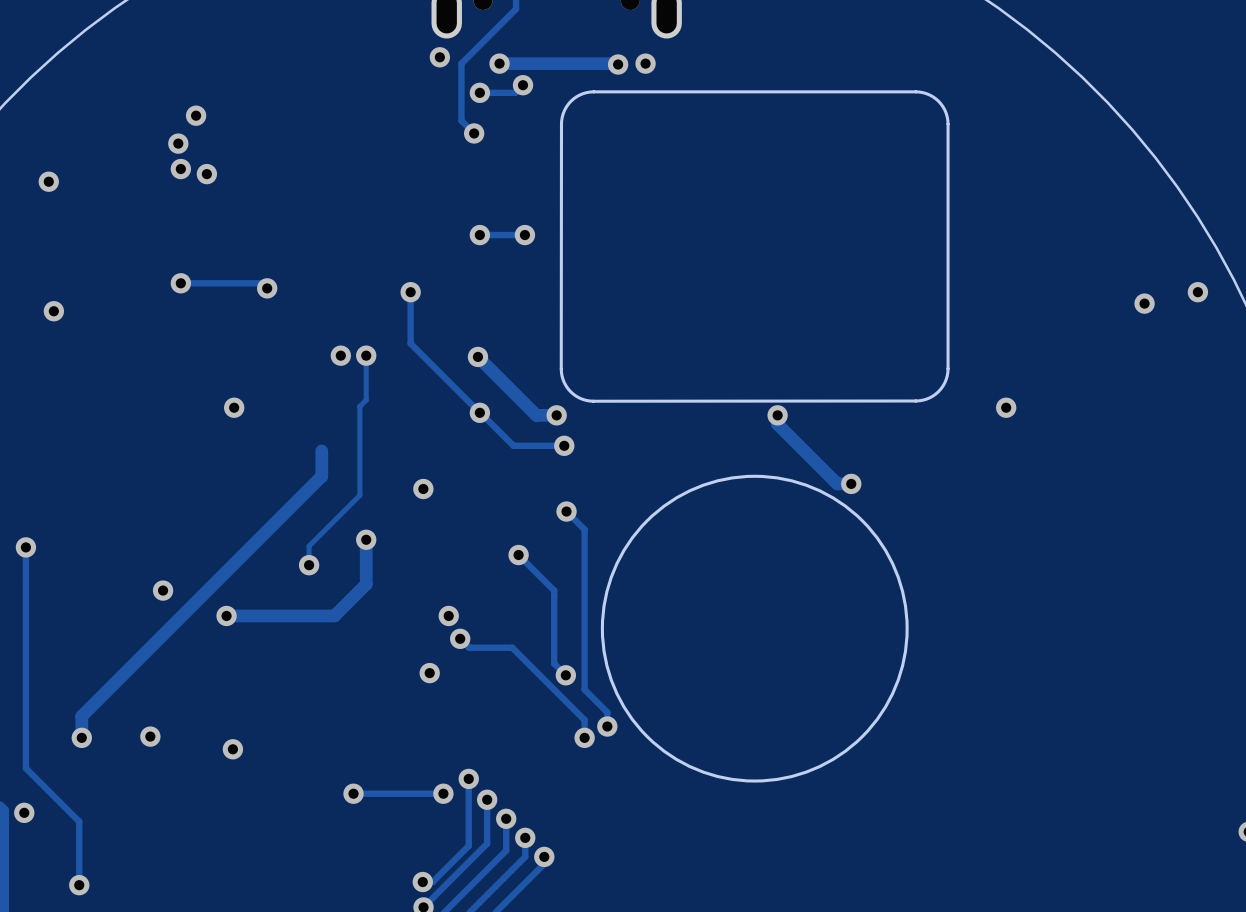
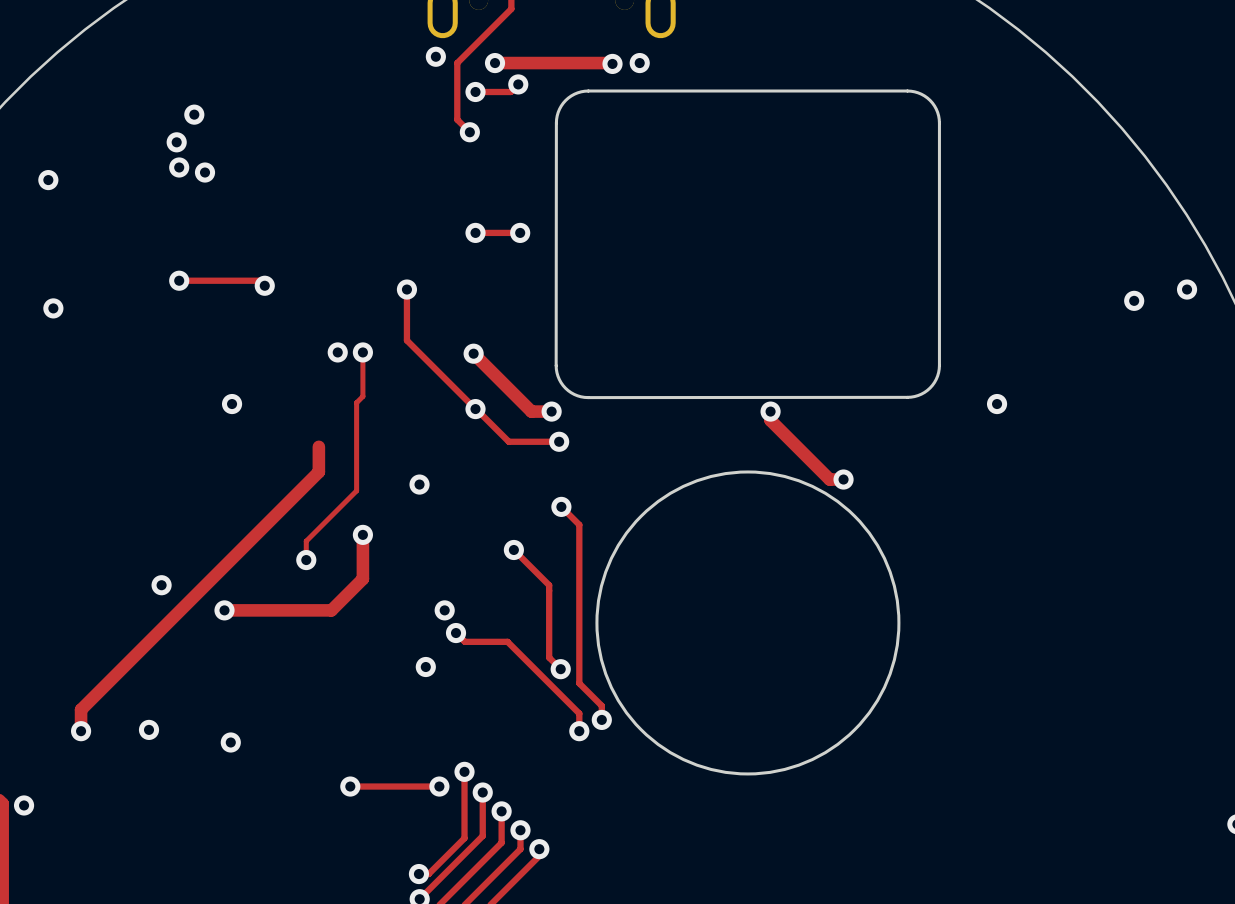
track: (25, 547) (25, 768) (79, 821) (79, 885) -> none
via: (25, 547) -> none
via: (79, 885) -> none

